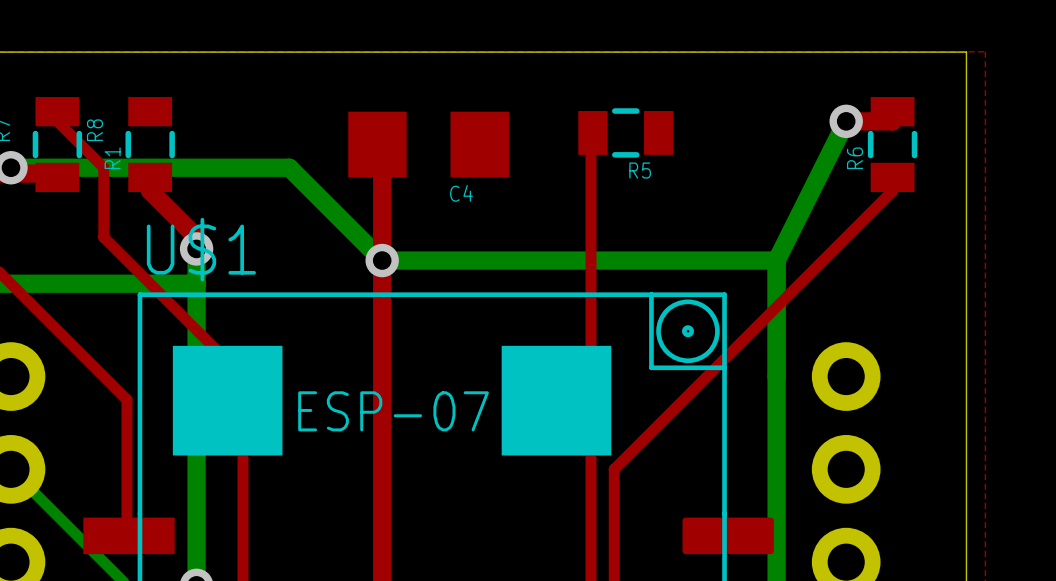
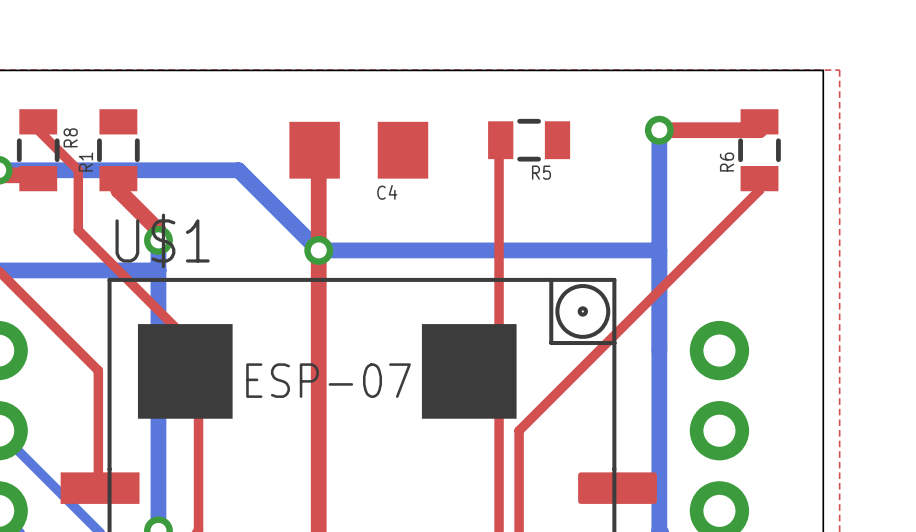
top track: none -> (659, 130) (719, 130)
bottom track: (846, 121) (776, 260) -> (659, 130) (659, 250)
via position: (846, 121) -> (659, 130)

